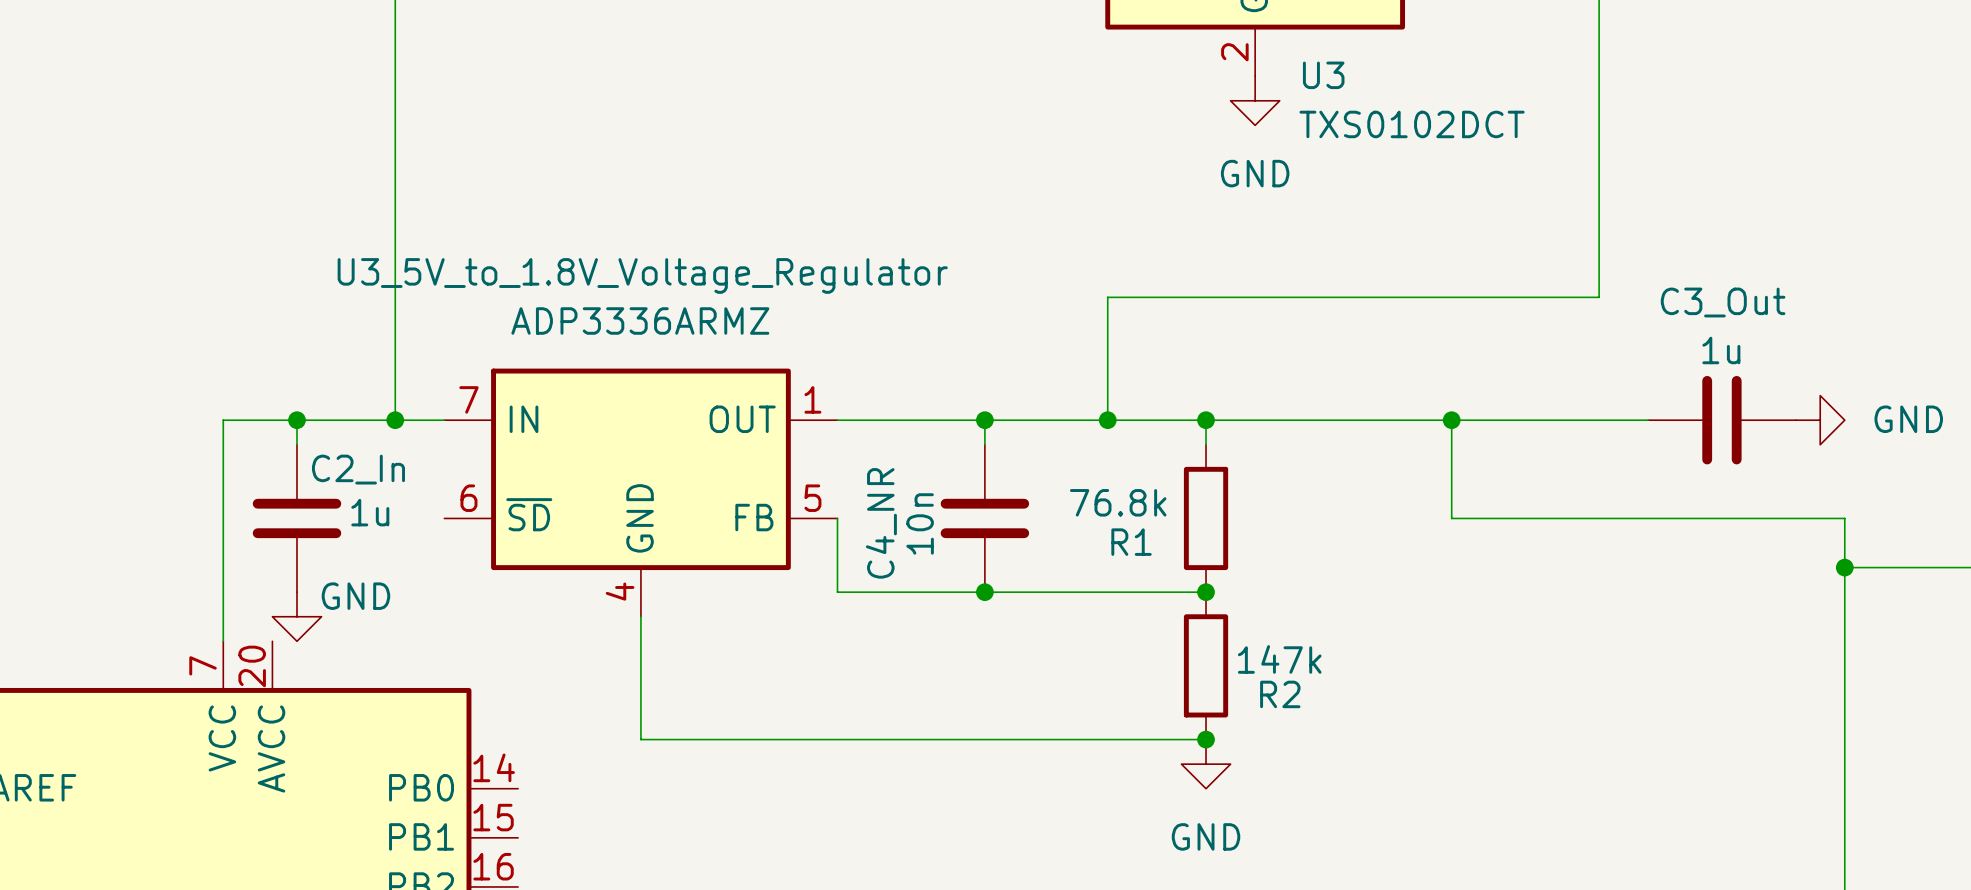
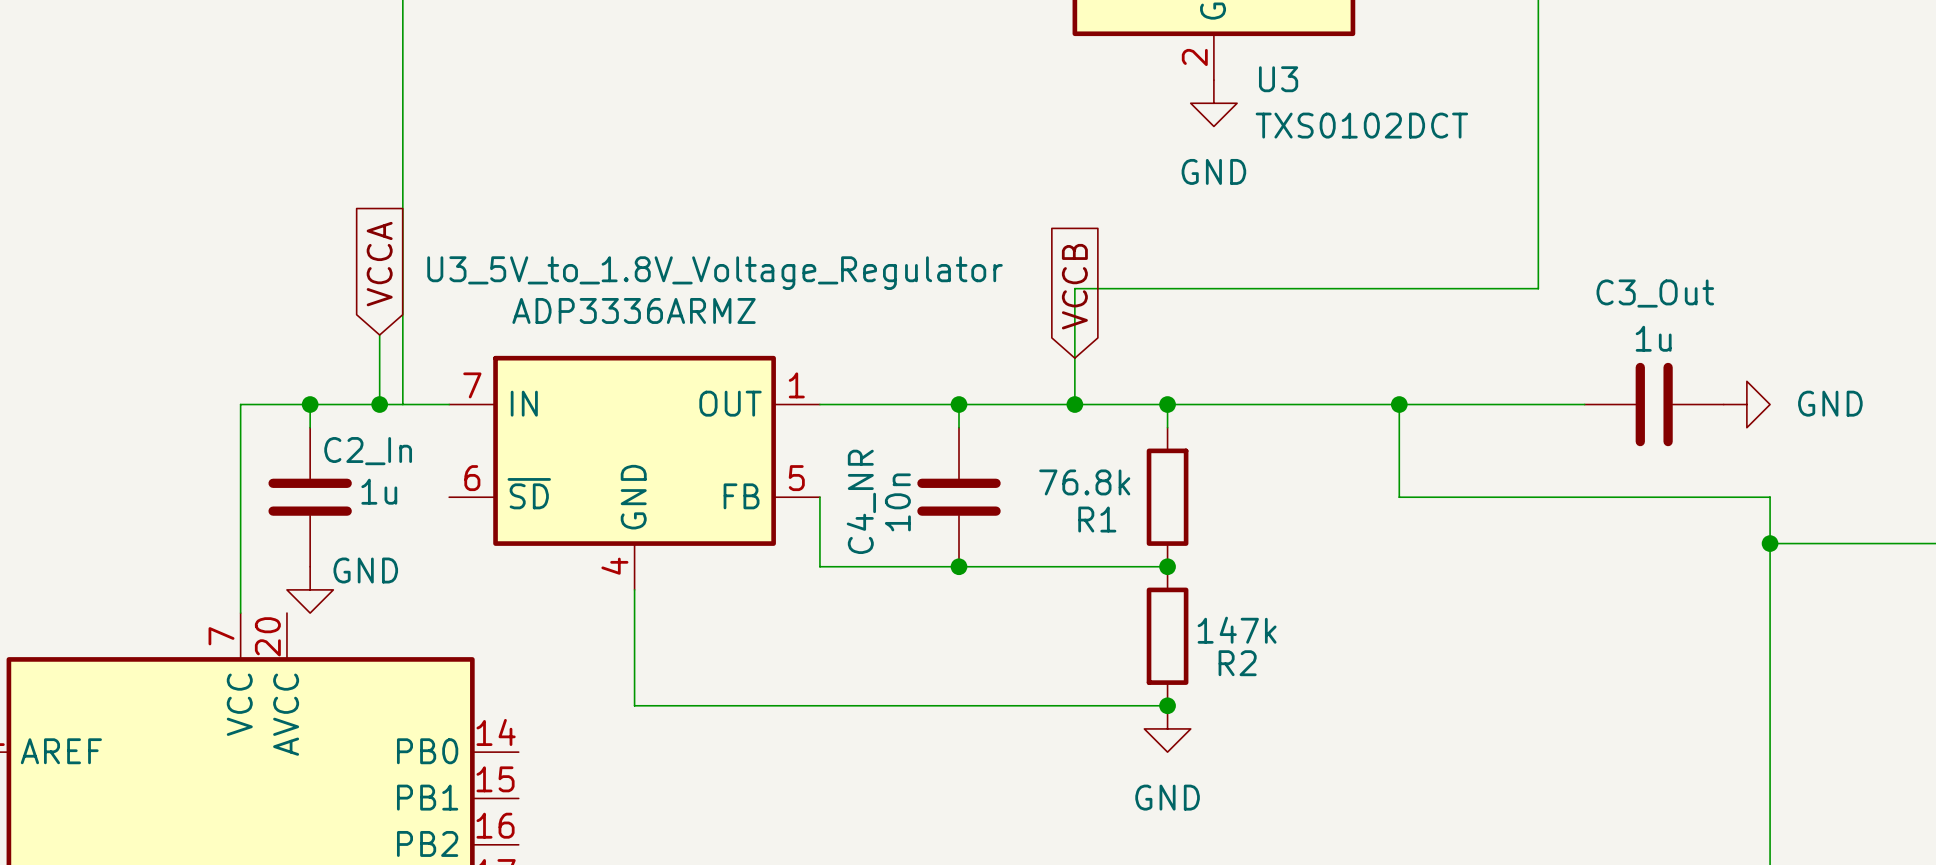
global label: none -> VCCA (379, 264)
U3_5V_to_1.8V_Voltage_Regulator name position: U3_5V_to_1.8V_Voltage_Regulator (642, 275) -> U3_5V_to_1.8V_Voltage_Regulator (715, 273)
global label: none -> VCCB (1074, 286)
wire: none -> (379, 335) (379, 404)
junction position: (395, 420) -> (379, 404)

